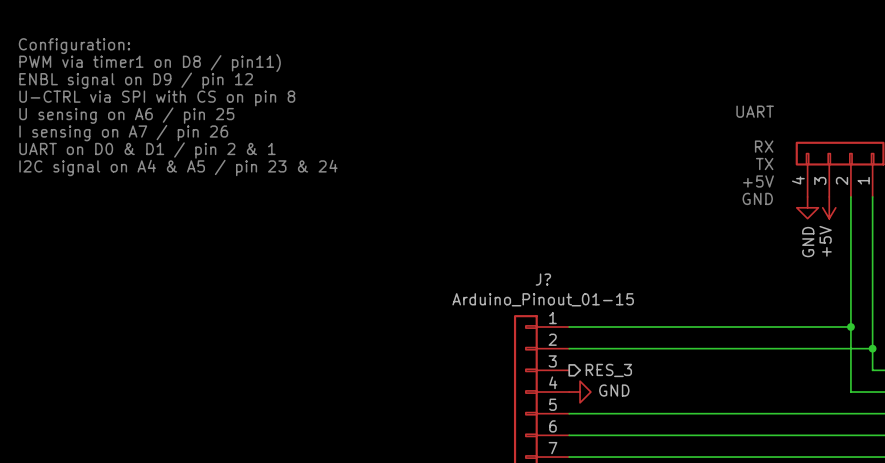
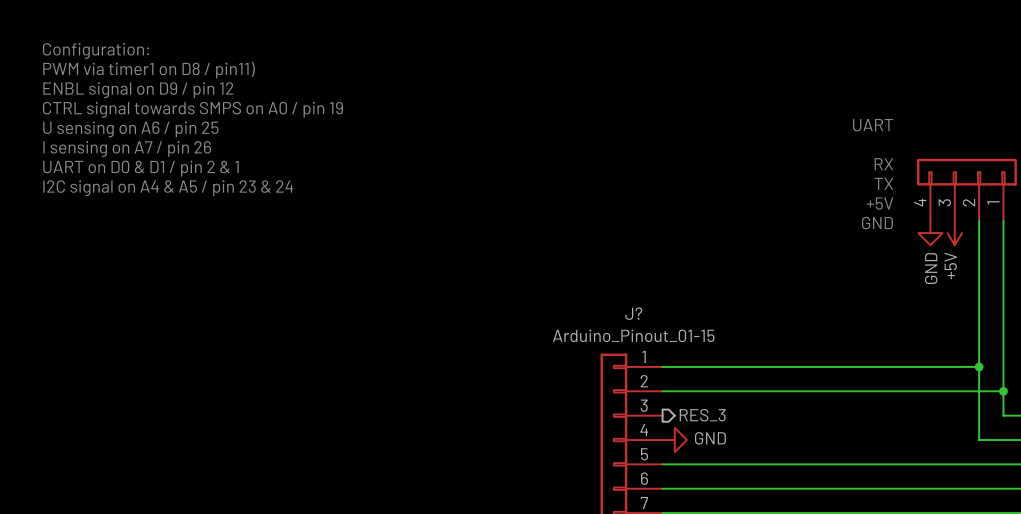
text: U-CTRL via SPI with CS on pin 8 (157, 98) -> CTRL signal towards SMPS on A0 / pin 19 (192, 109)

